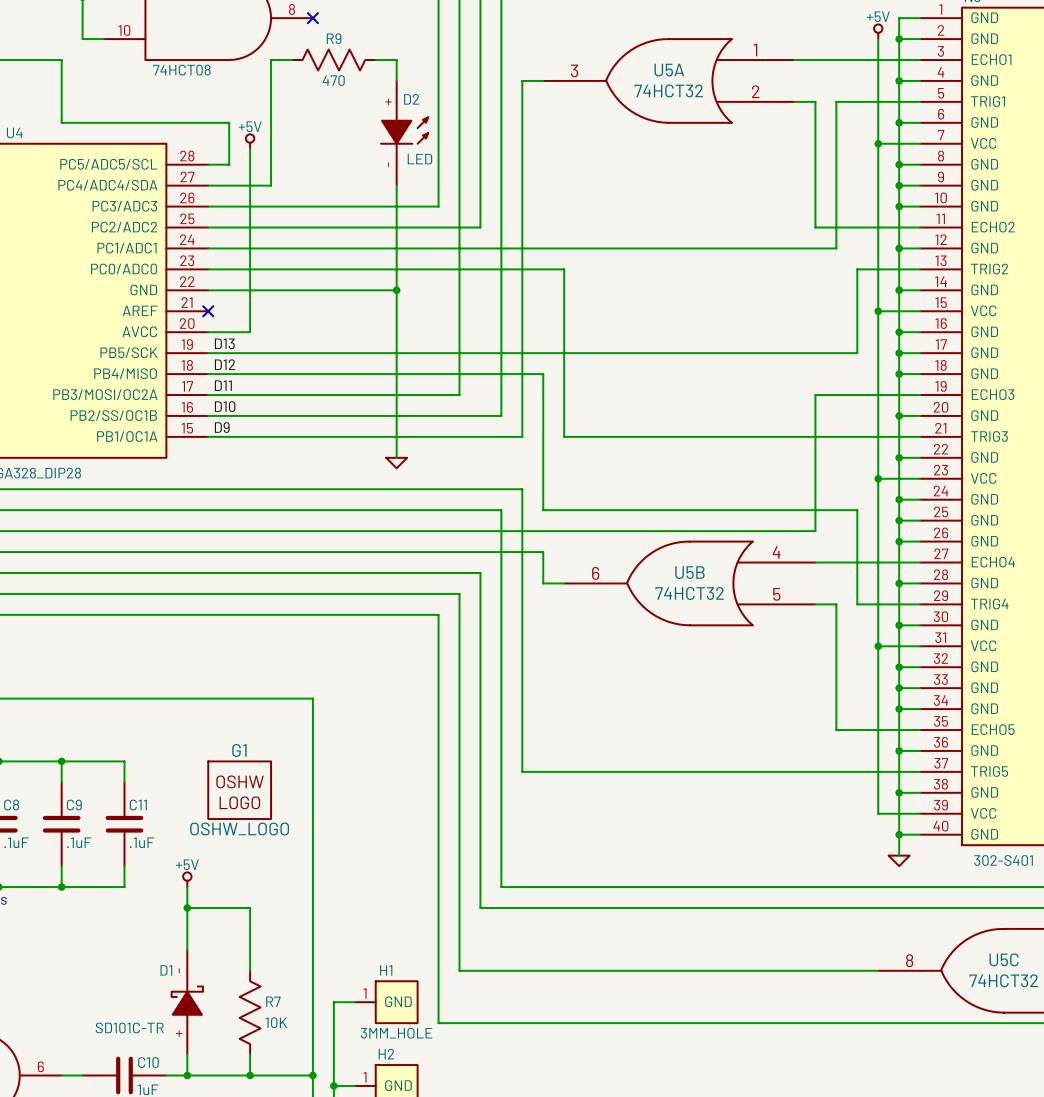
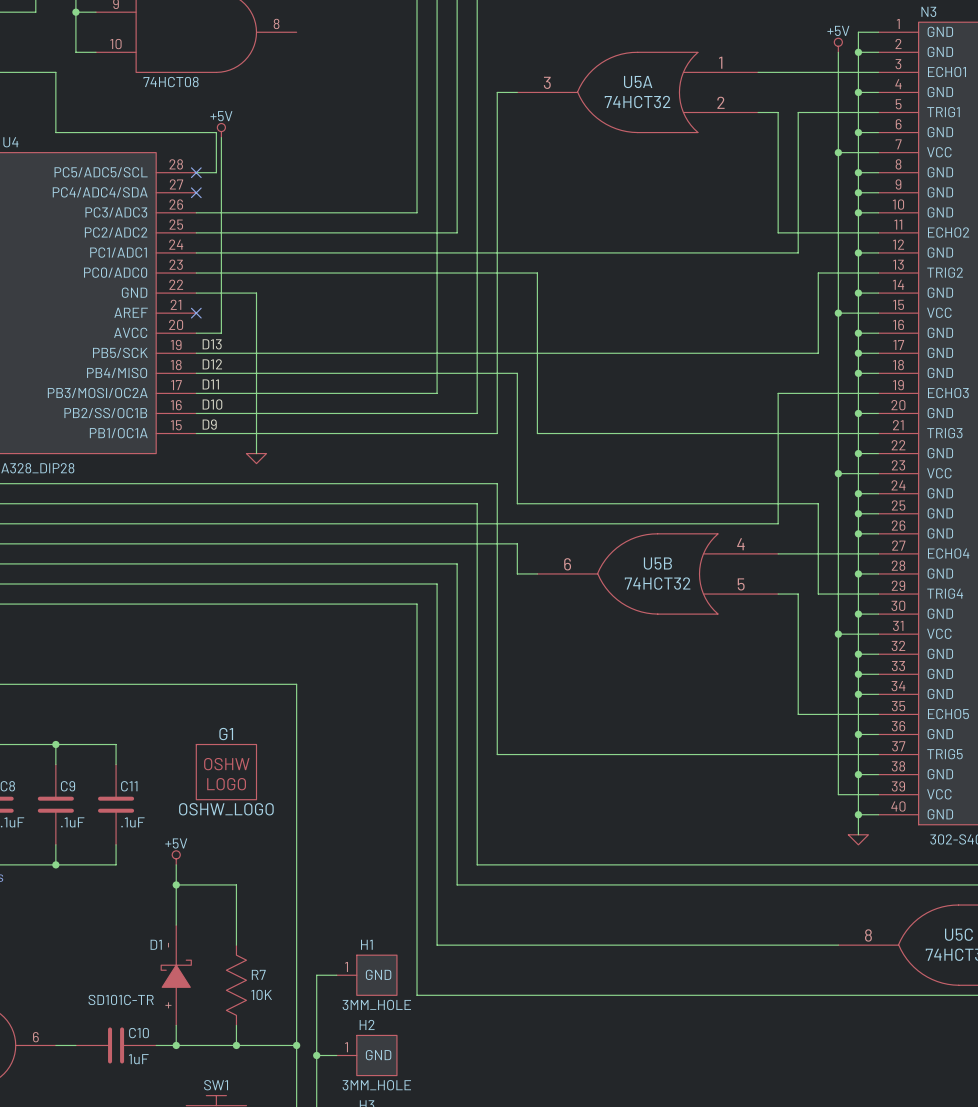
no-connect mark: (312, 18) -> none
wire: (291, 60) (271, 60) (271, 185) (208, 185) -> none
R9: 470 (333, 60) -> none
wire: (375, 60) (396, 60) (396, 80) -> none
D2: LED (404, 133) -> none
power symbol position: +5V (250, 141) -> +5V (221, 130)
wire: (250, 149) (250, 332) (234, 332) -> (221, 137) (221, 333)
no-connect mark: none -> (196, 172)
no-connect mark: none -> (196, 192)
wire: (396, 185) (396, 457) -> none
wire: (271, 290) (396, 290) -> (256, 293) (256, 453)
junction: (396, 290) -> none
power symbol position: (396, 463) -> (256, 458)

